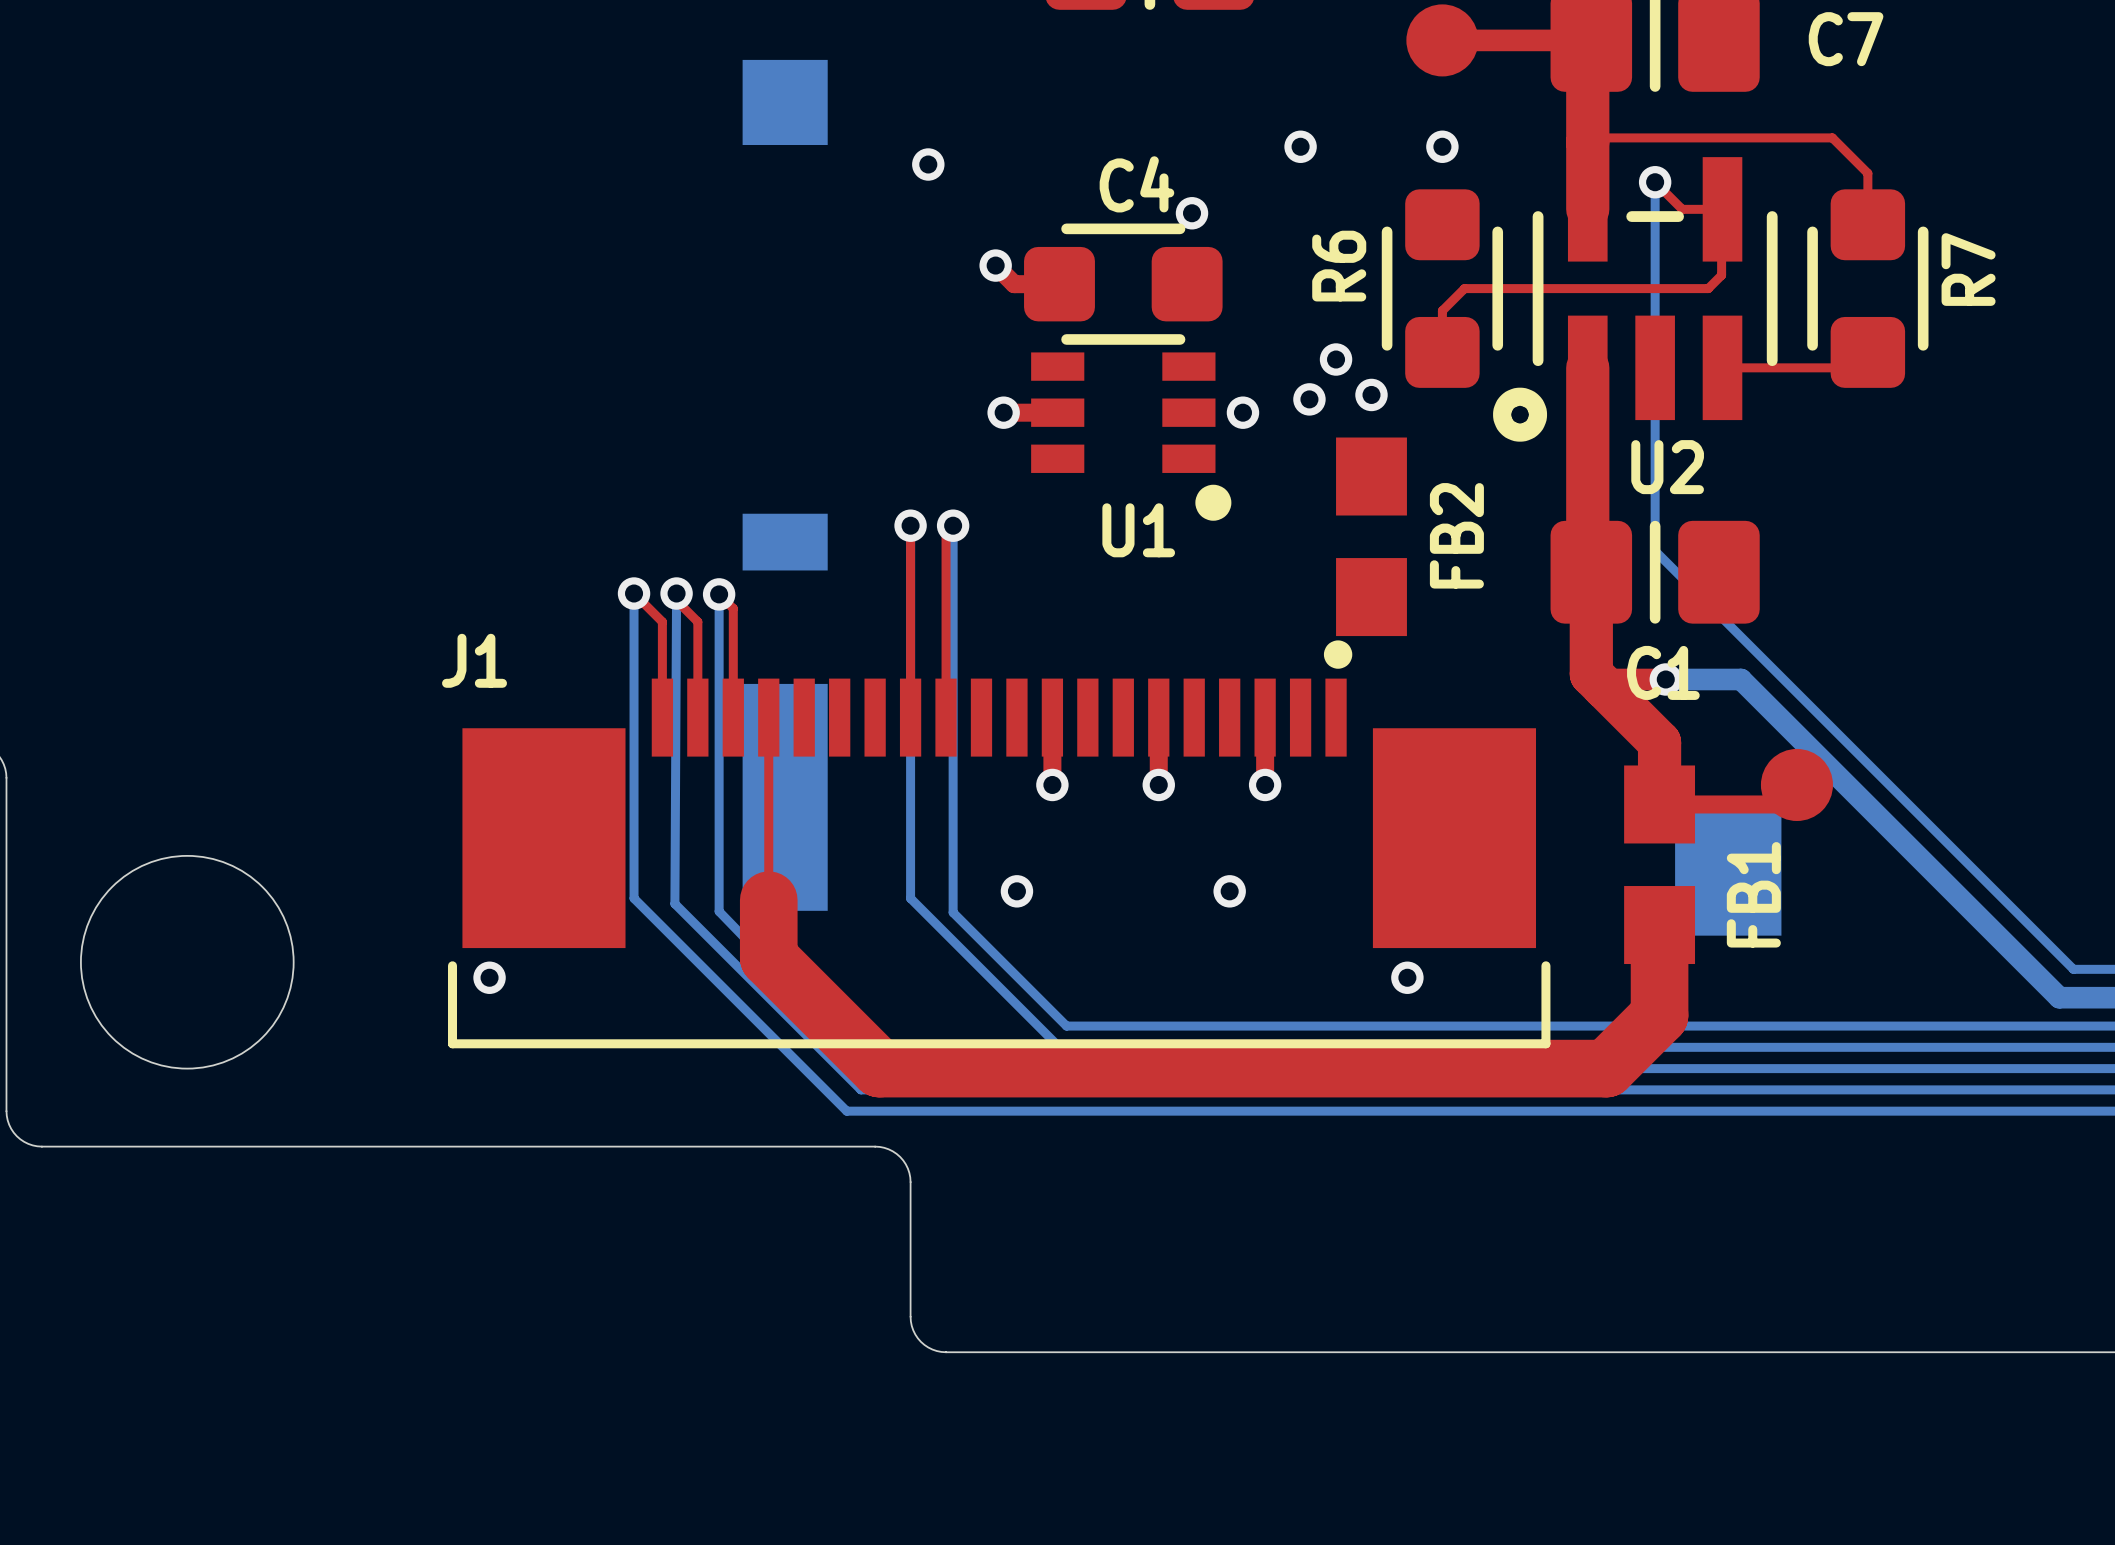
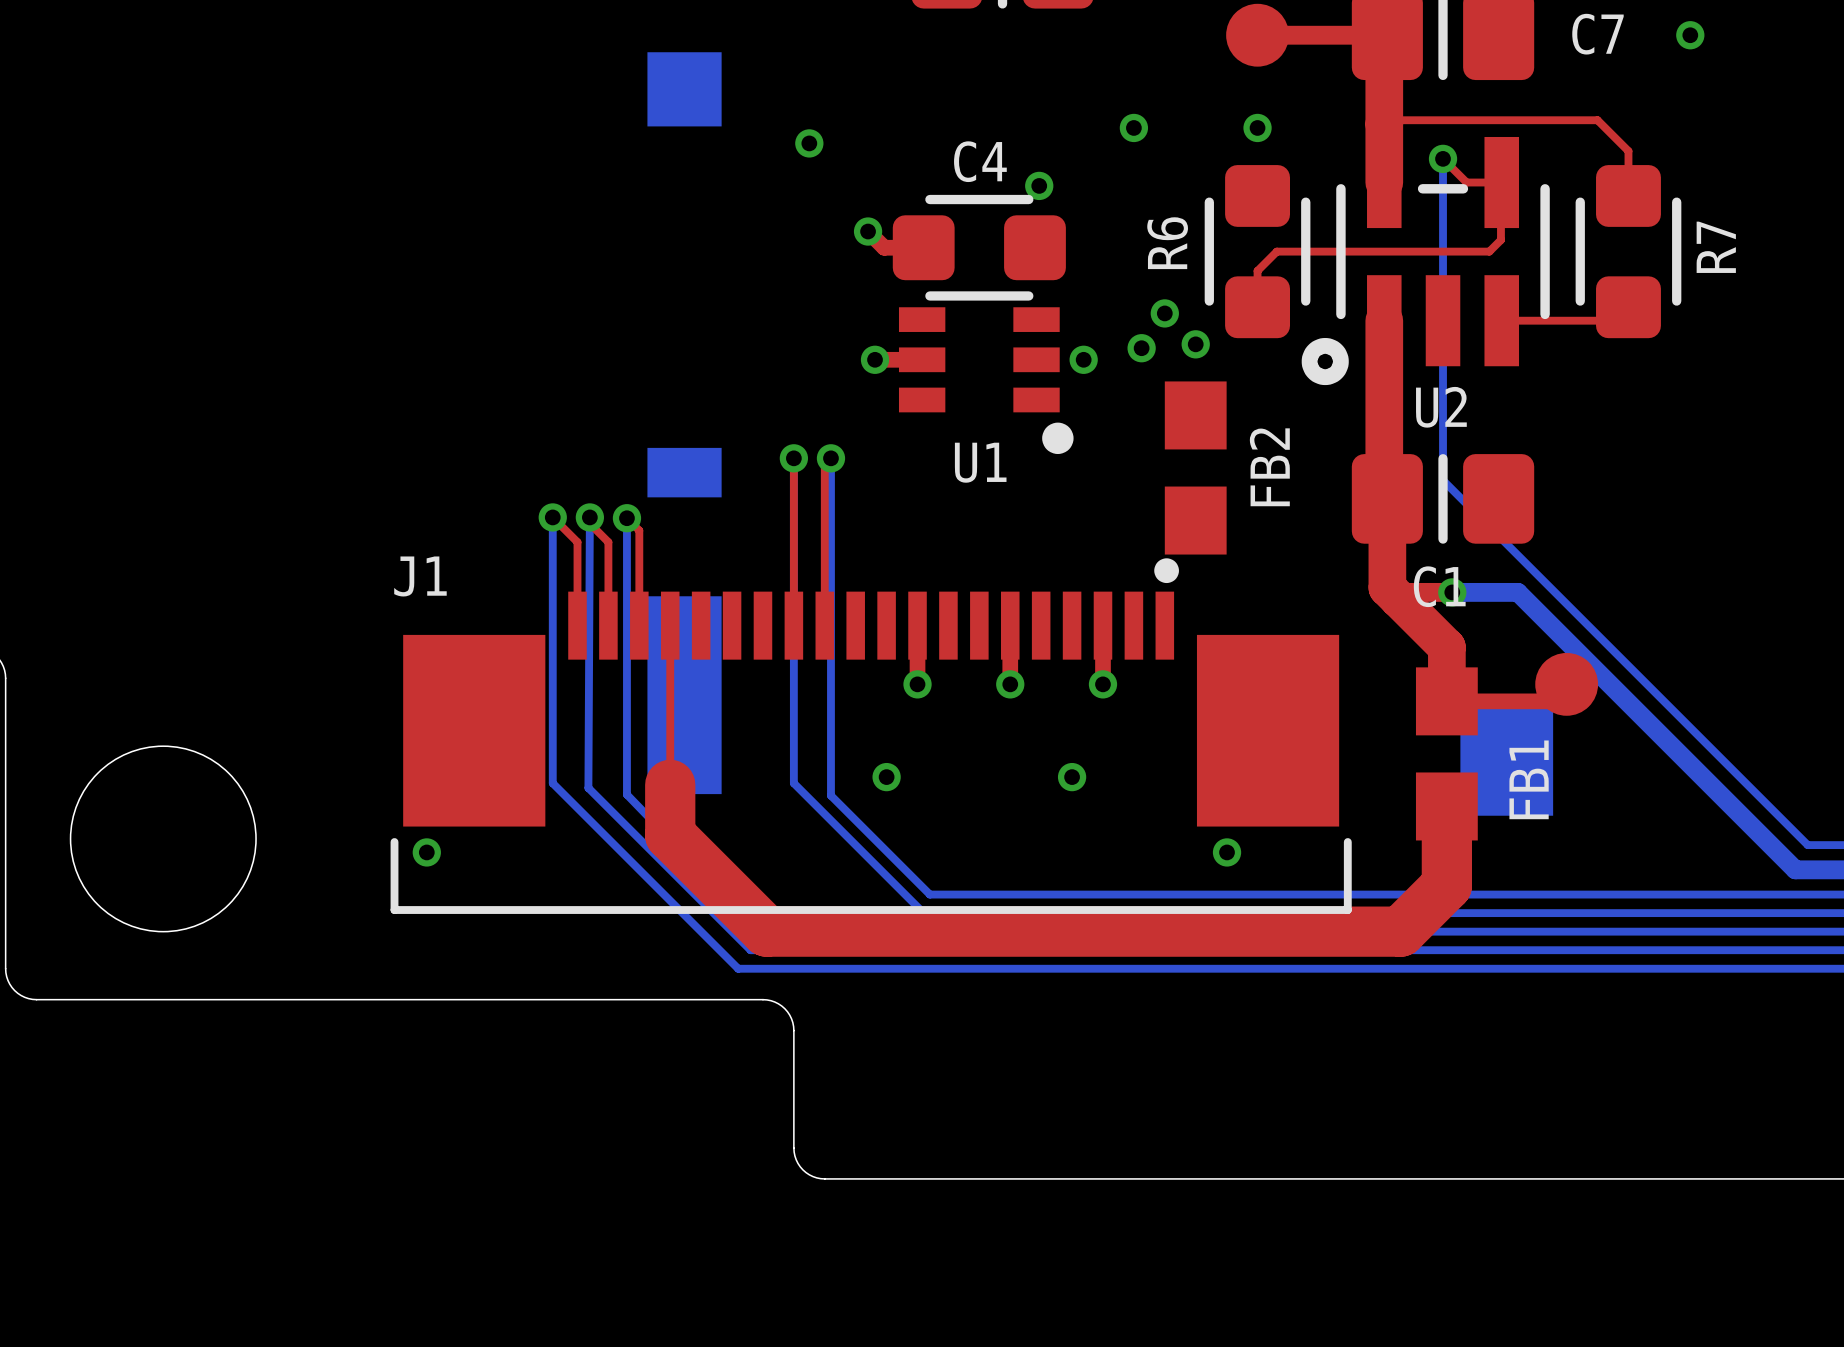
via: none -> (1690, 35)

